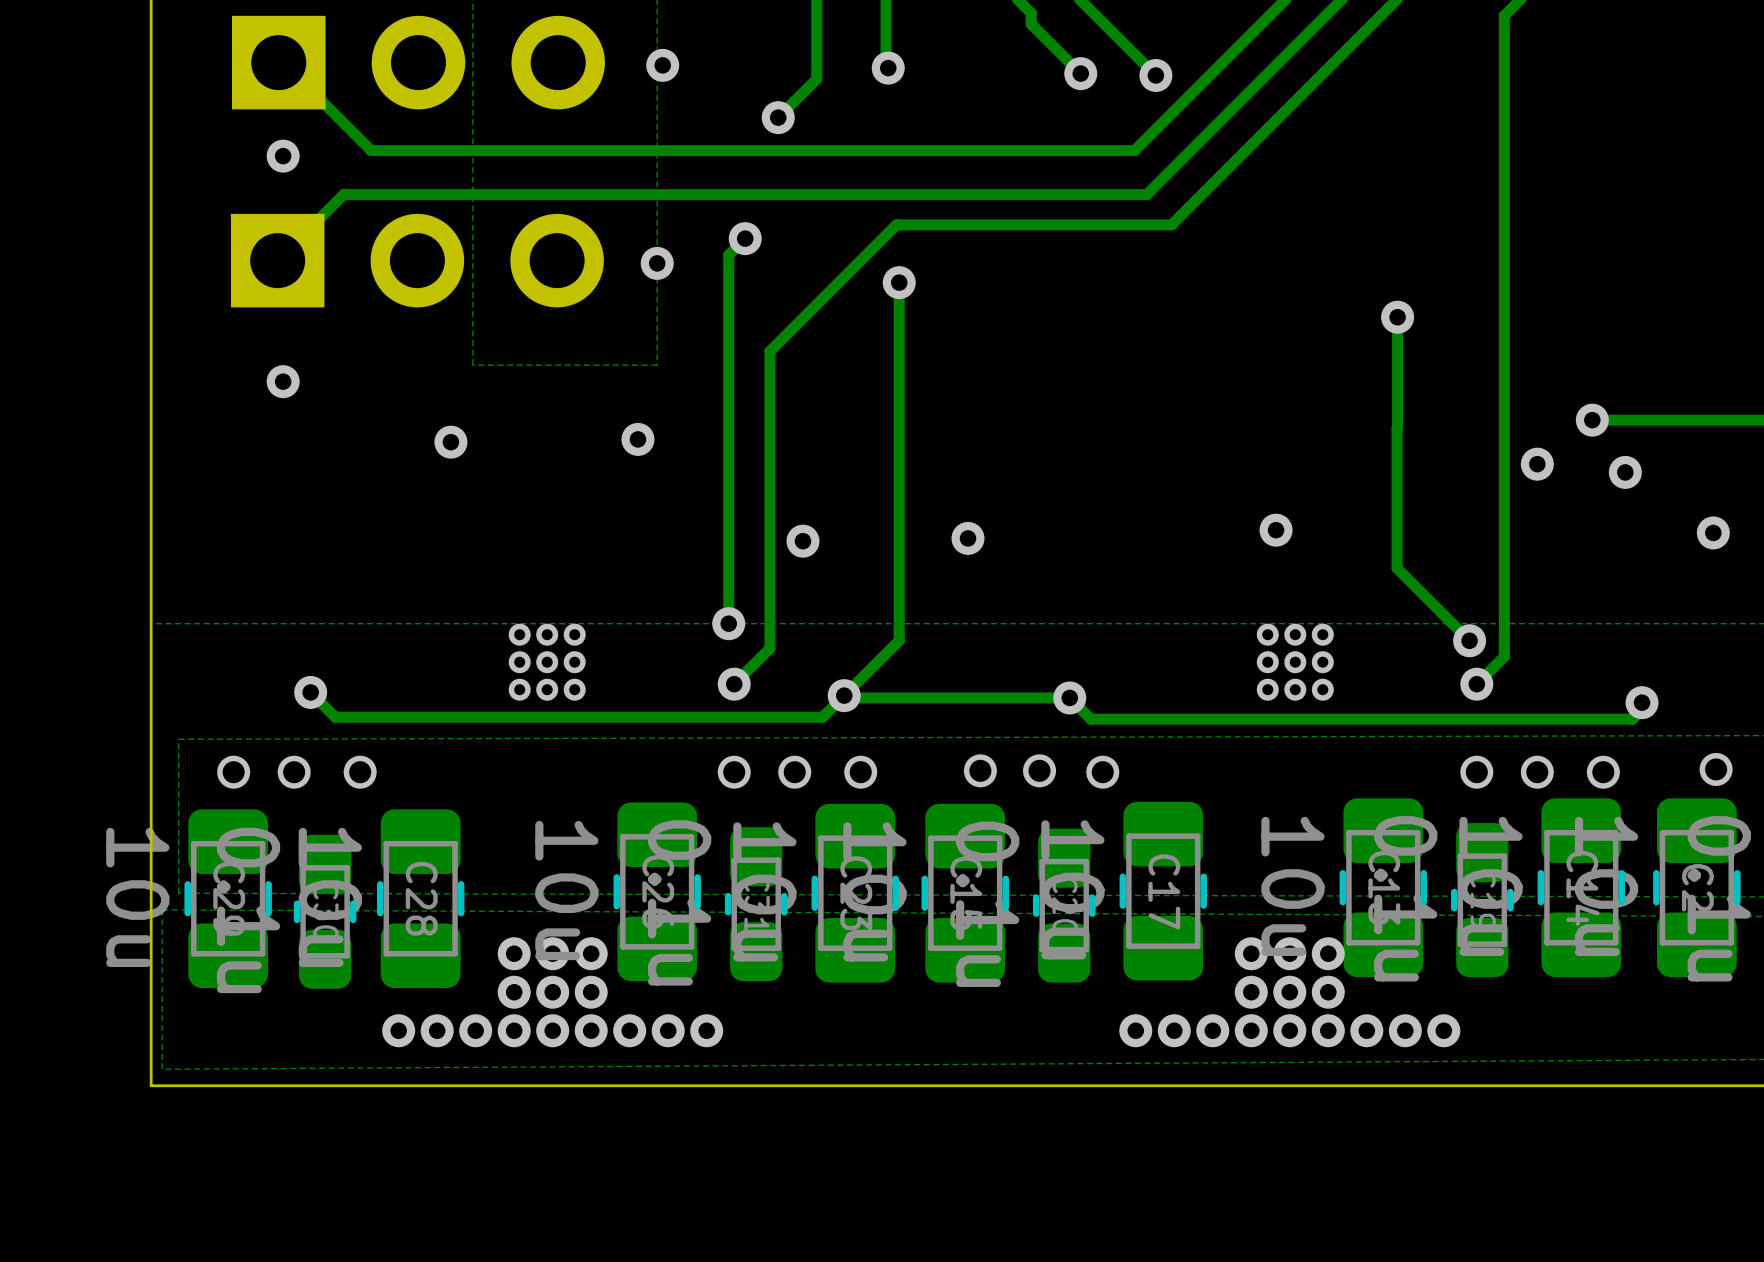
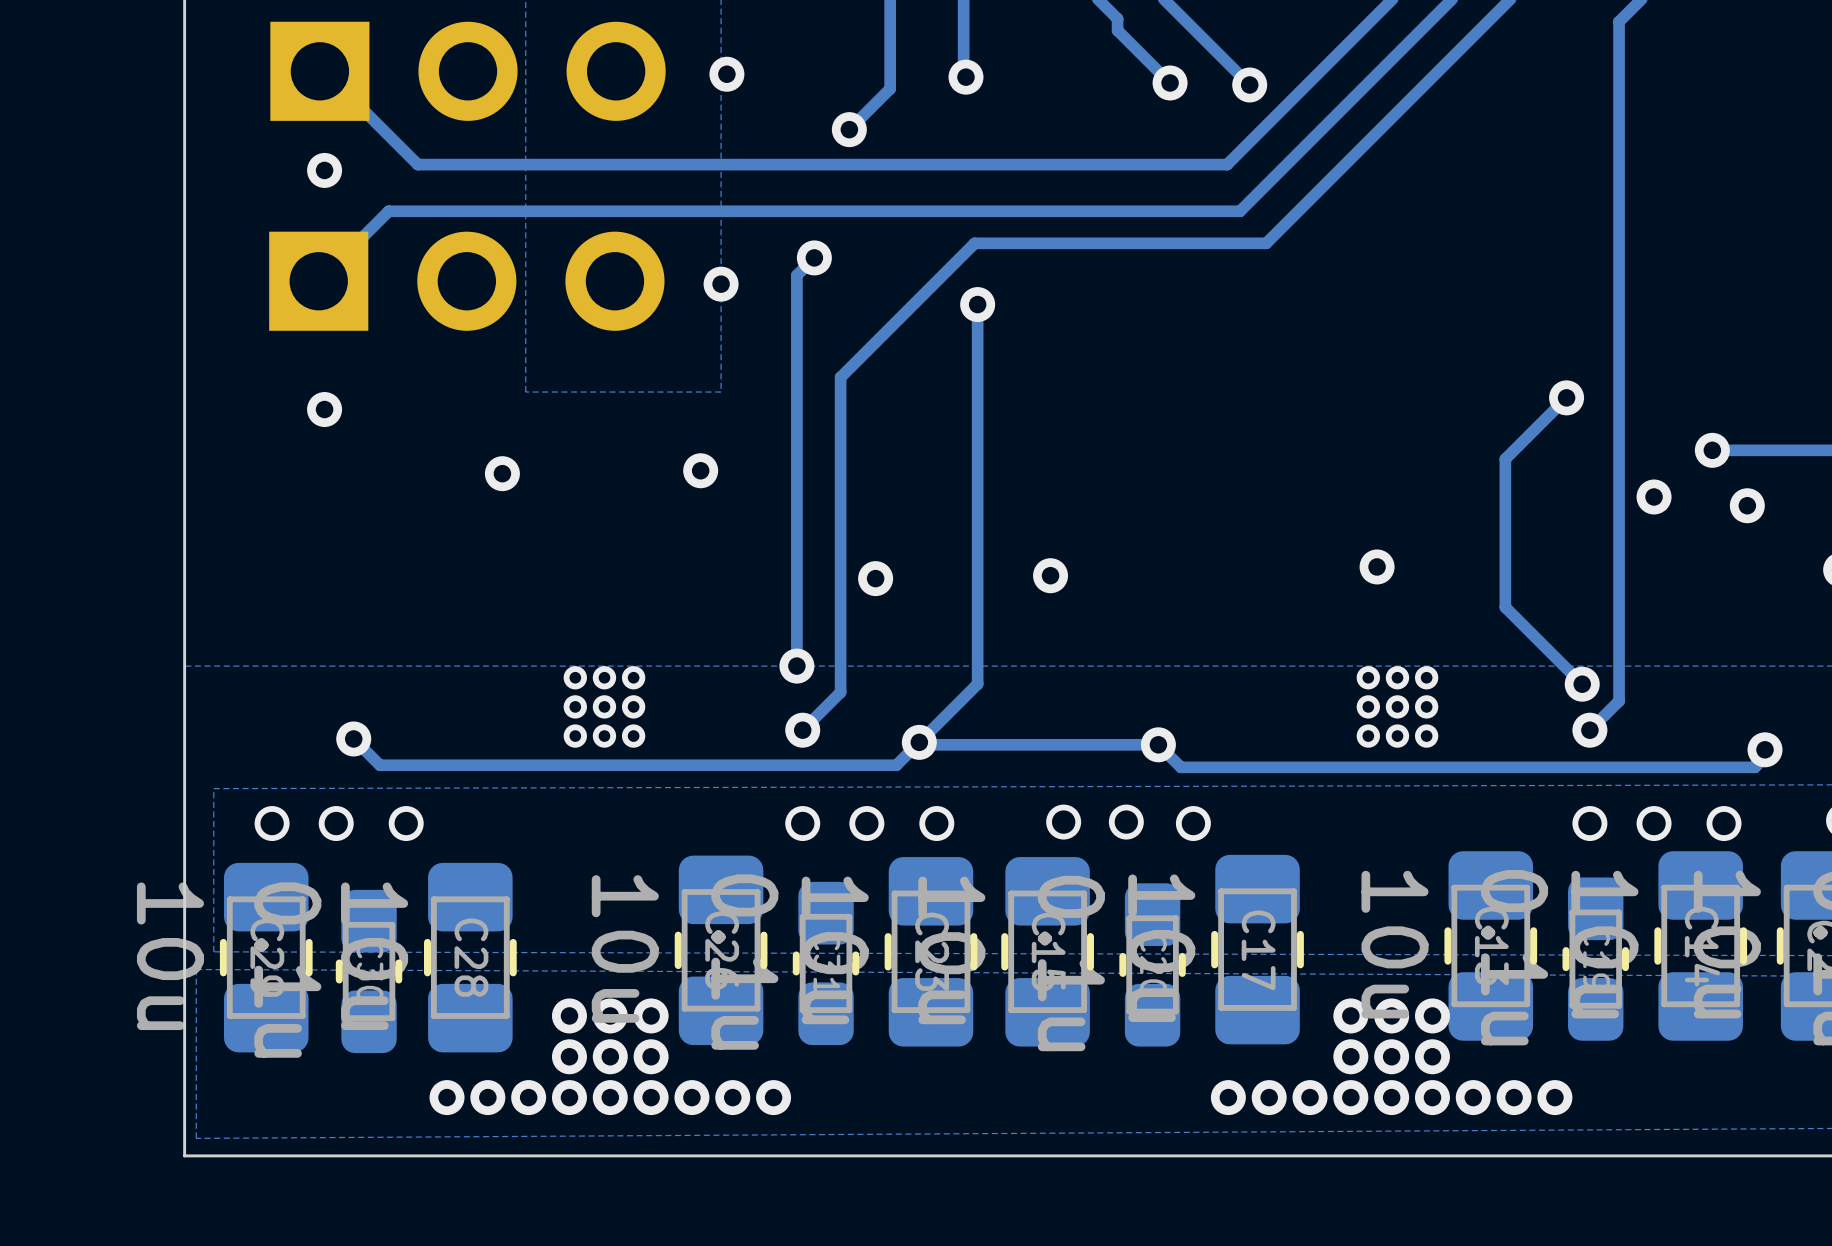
track: (1397, 317) (1397, 427) -> (1566, 397) (1505, 458)
via position: (1397, 317) -> (1566, 397)

